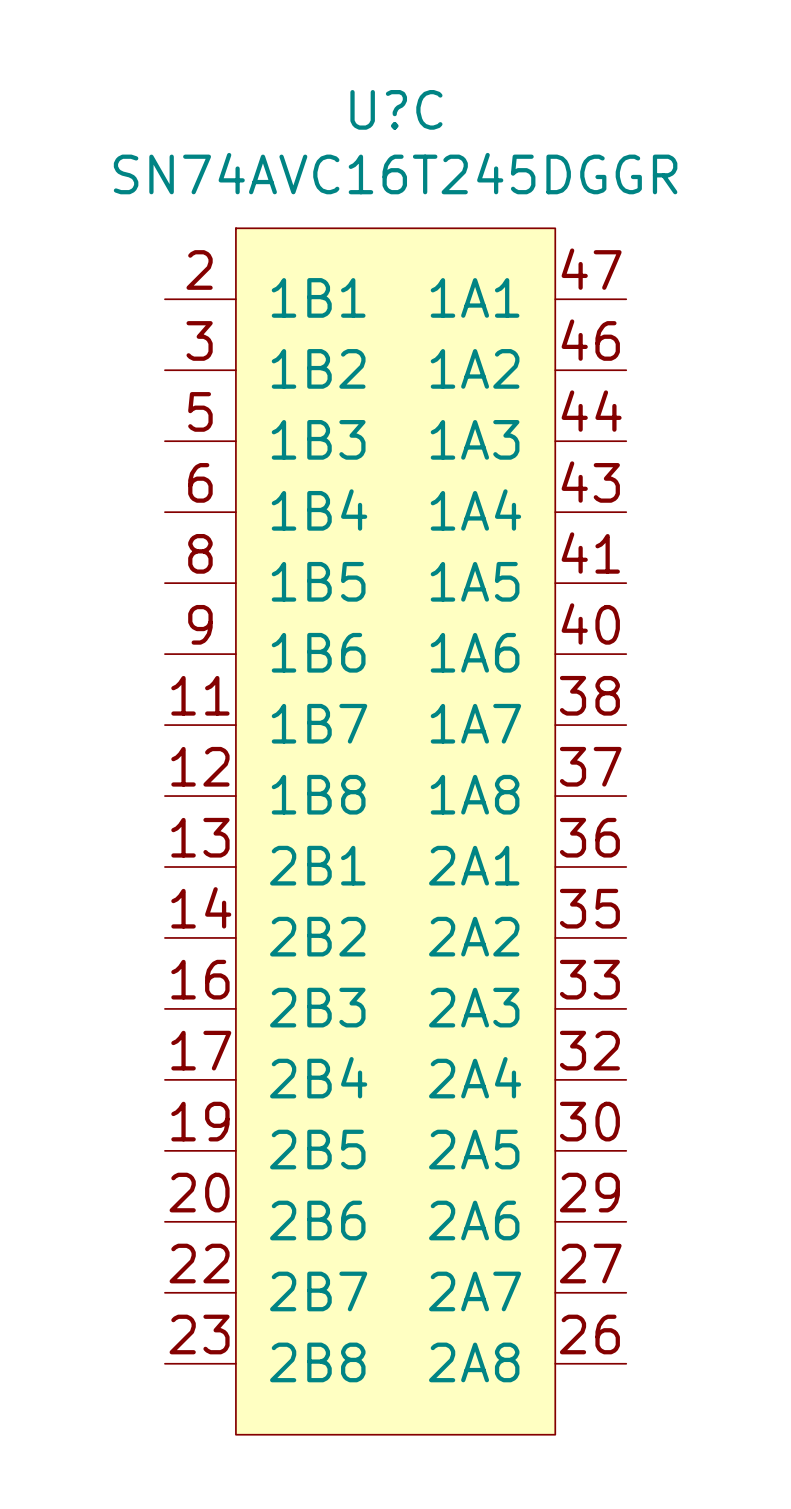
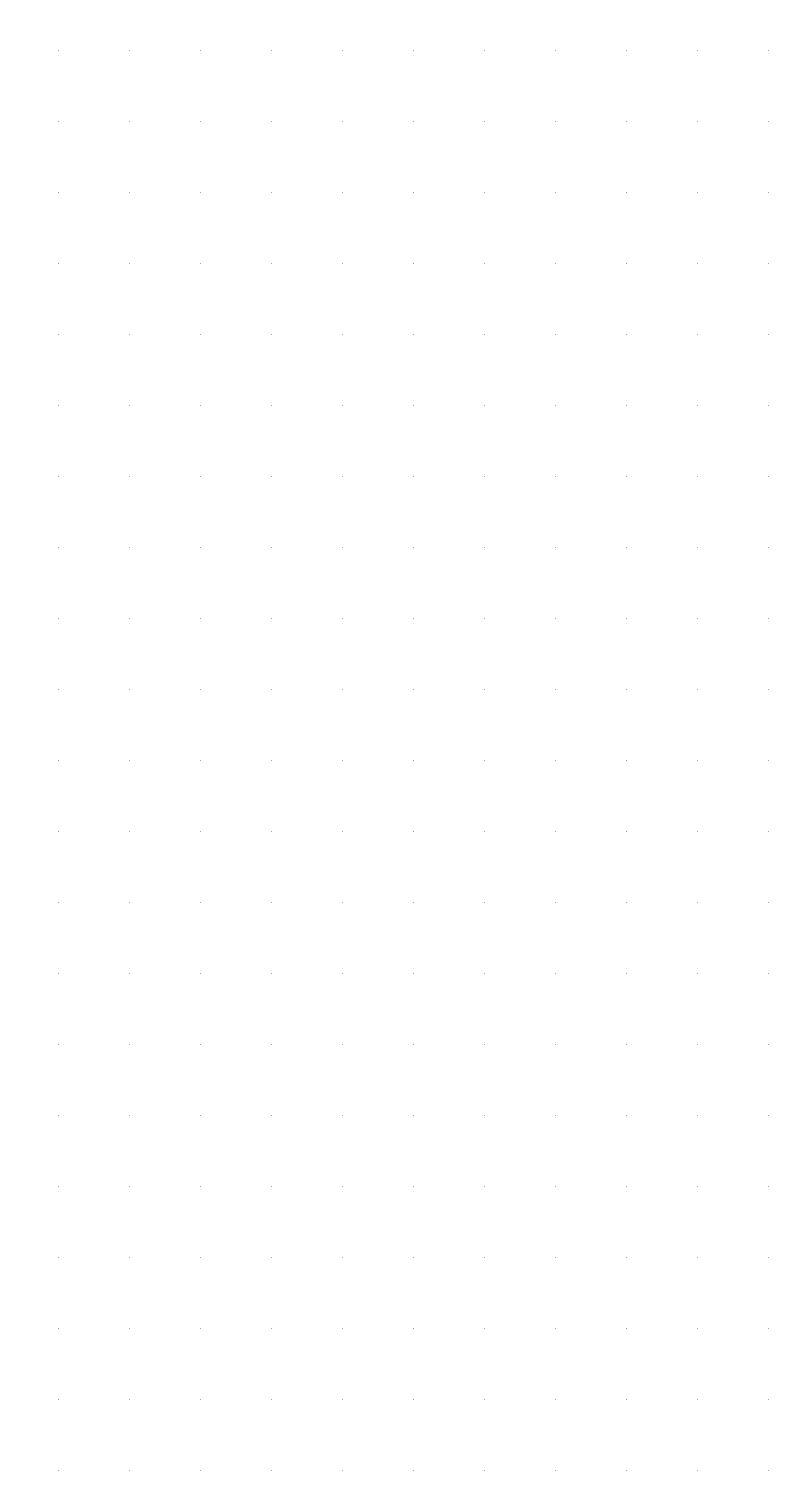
U?C: SN74AVC16T245DGGR (395, 831) -> none

